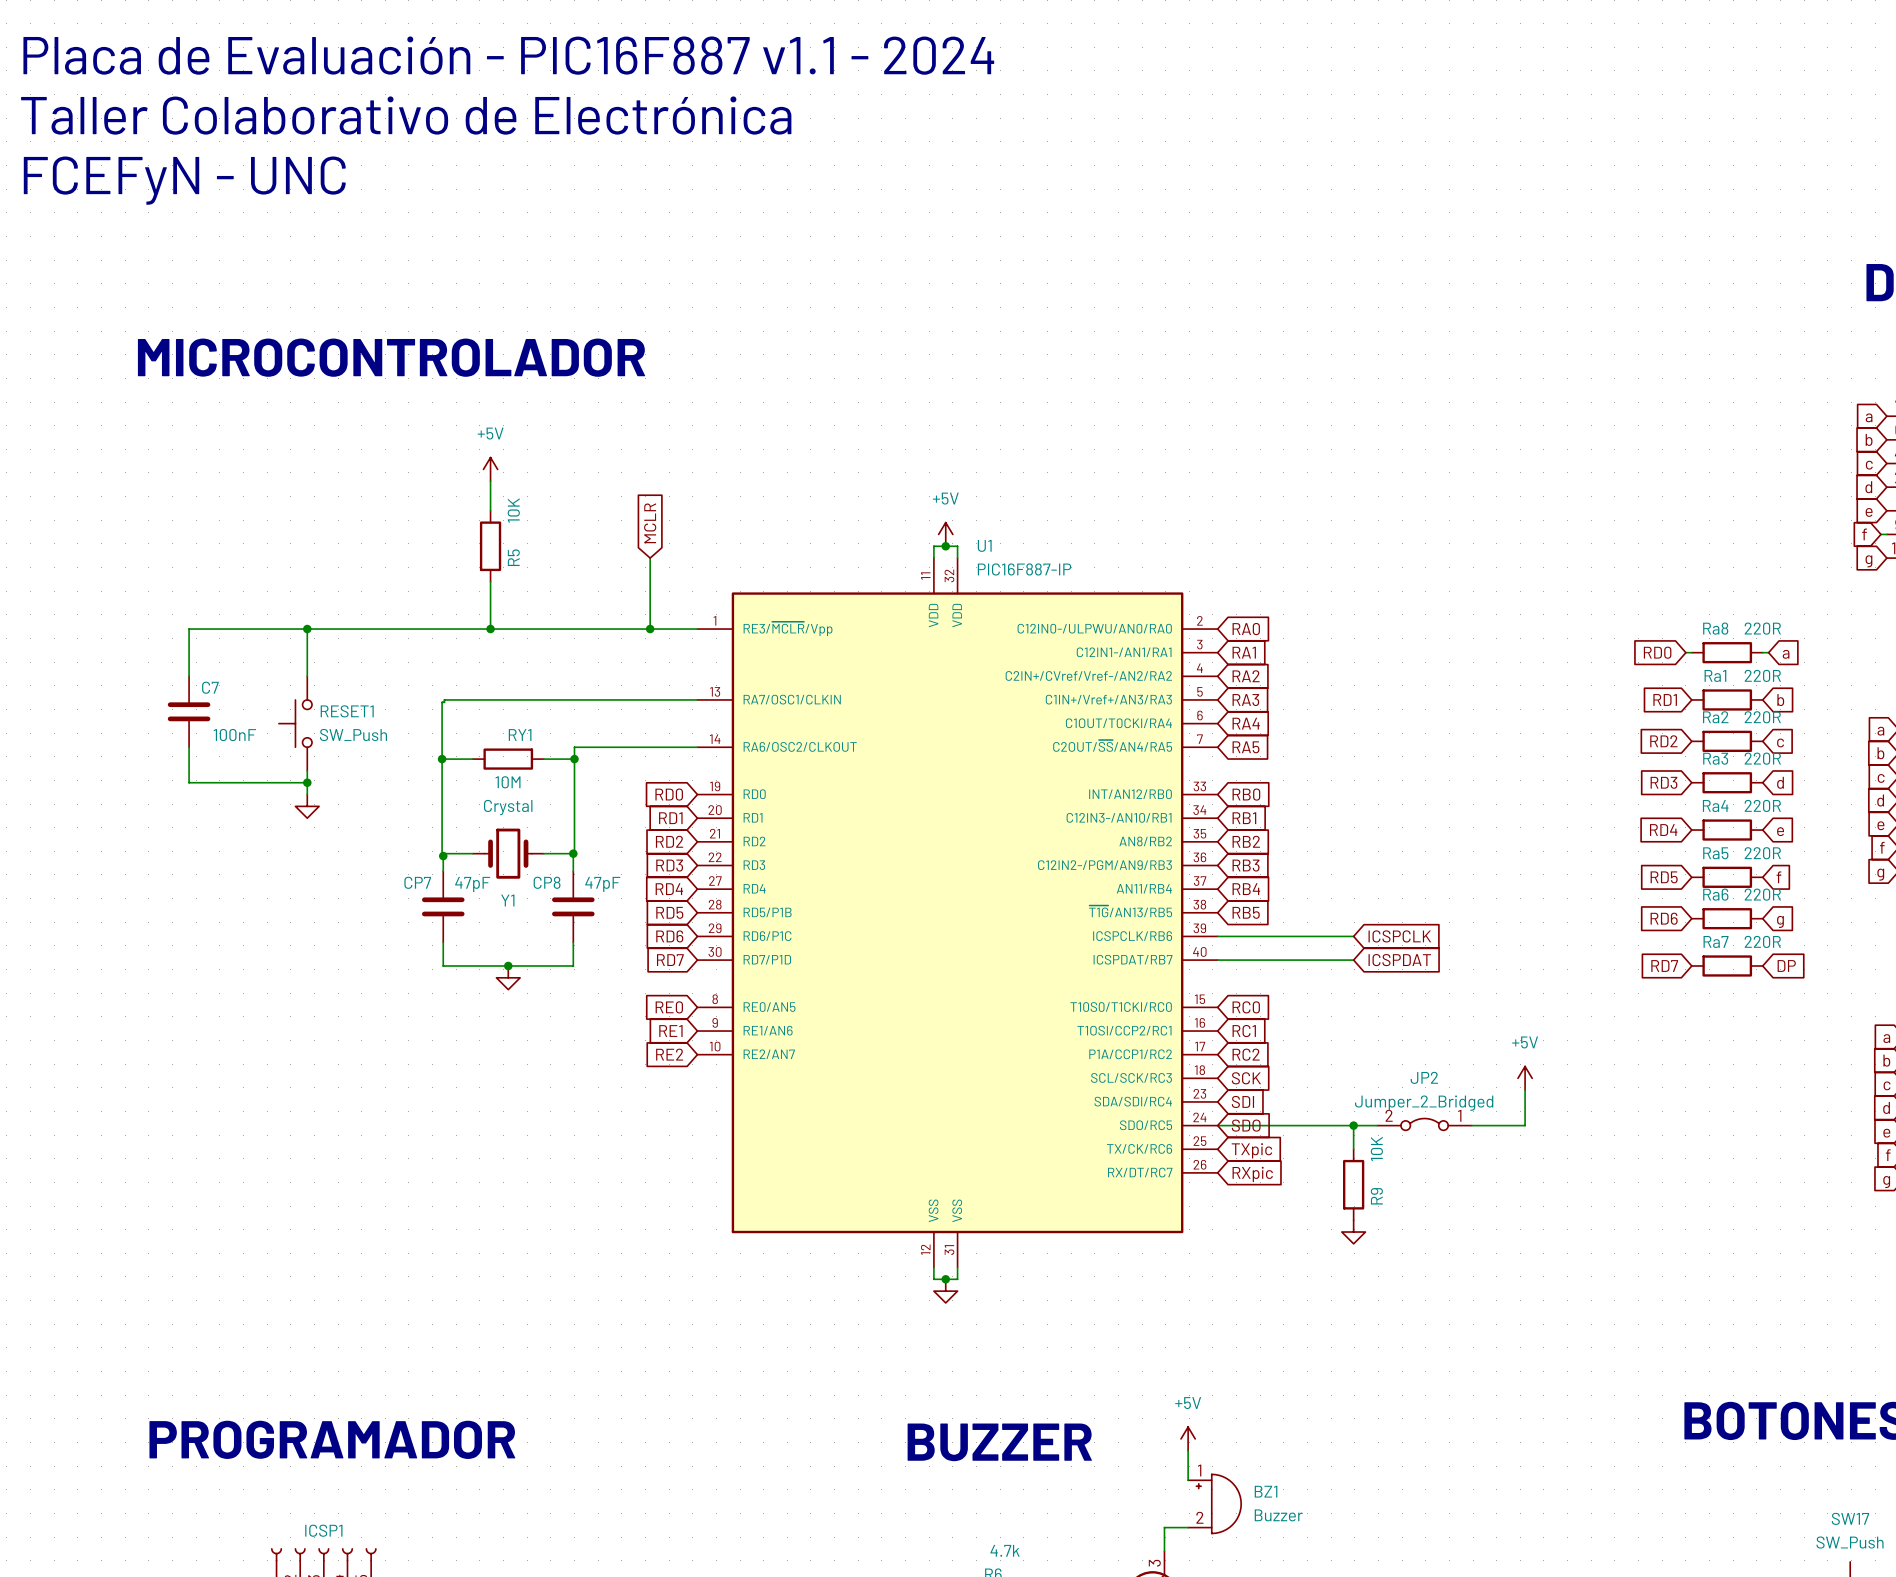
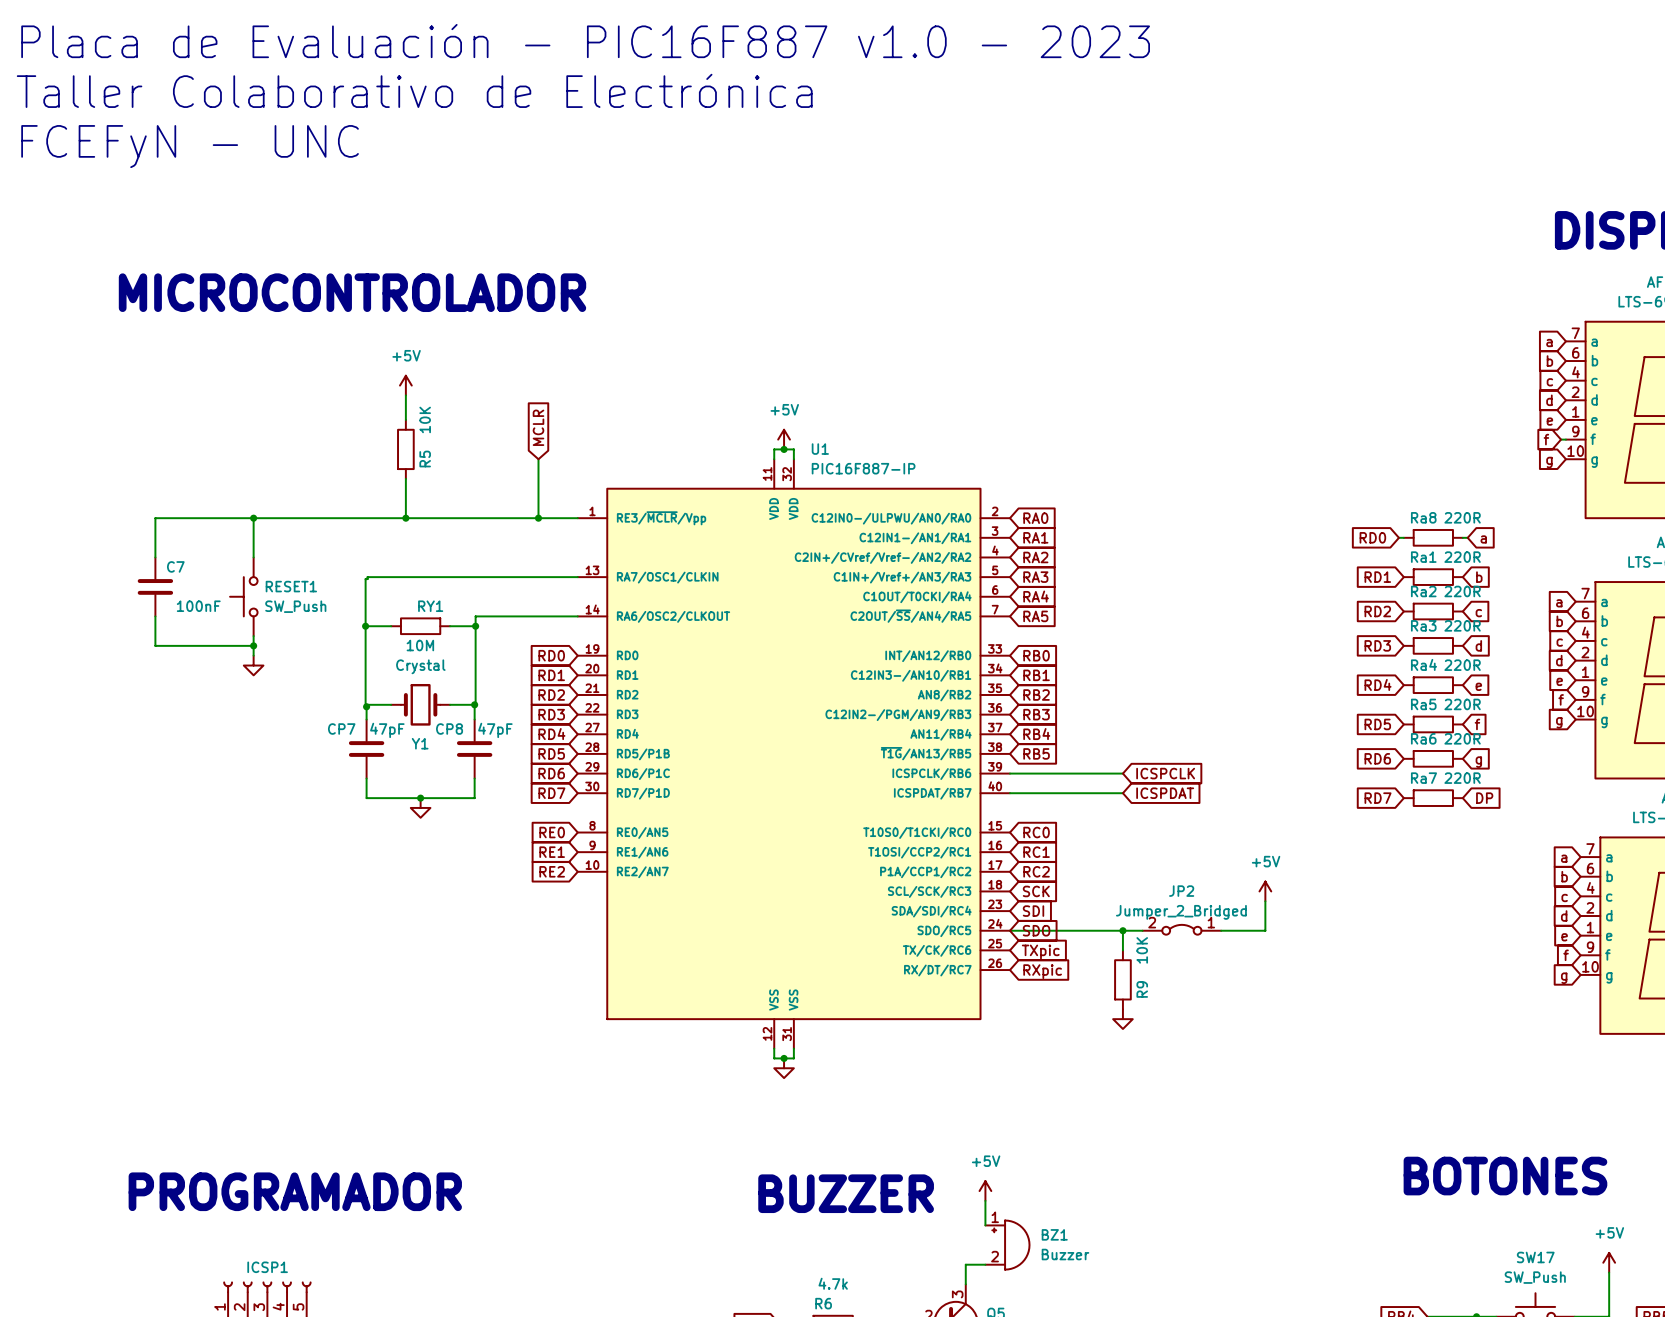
text: Placa de Evaluación - PIC16F887 v1.1 - 2024 (508, 55) -> Placa de Evaluación - PIC16F887 v1.0 - 2023 (585, 41)

